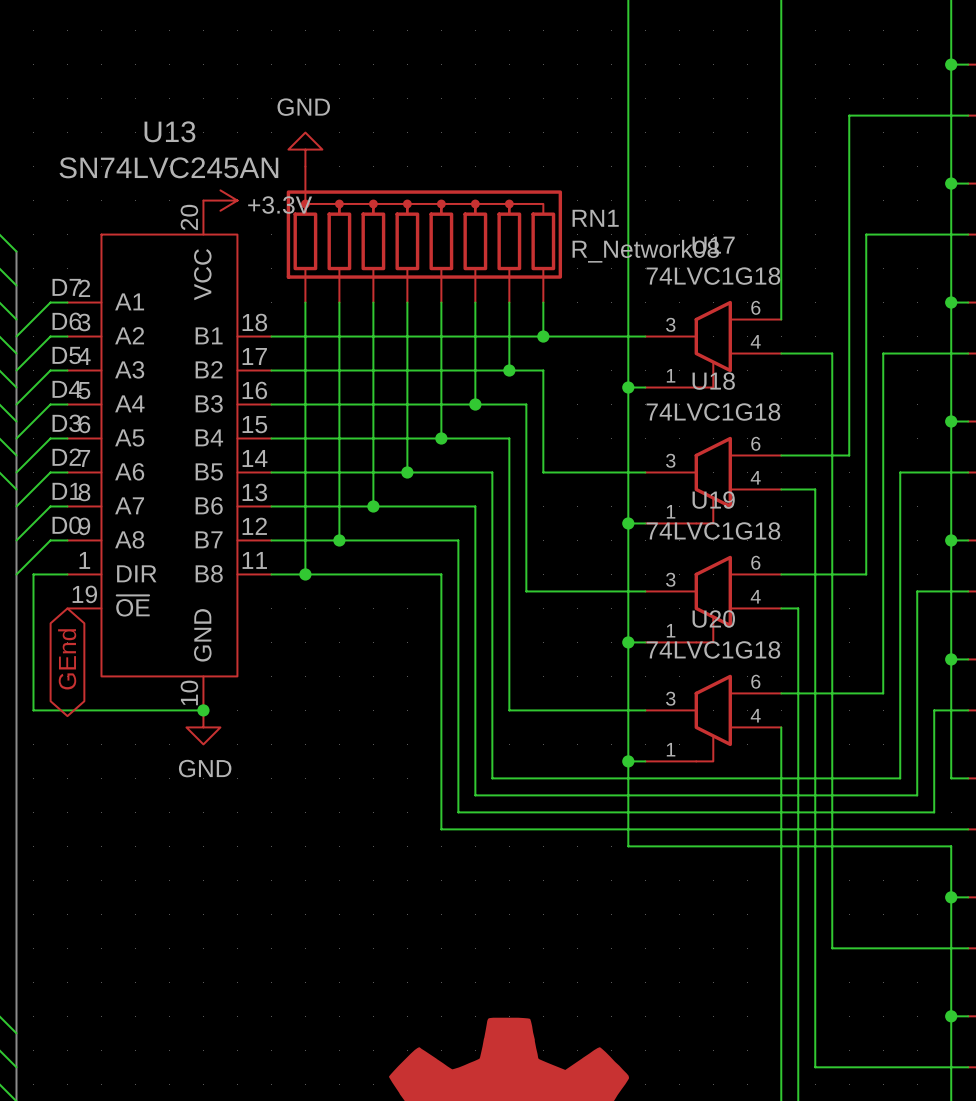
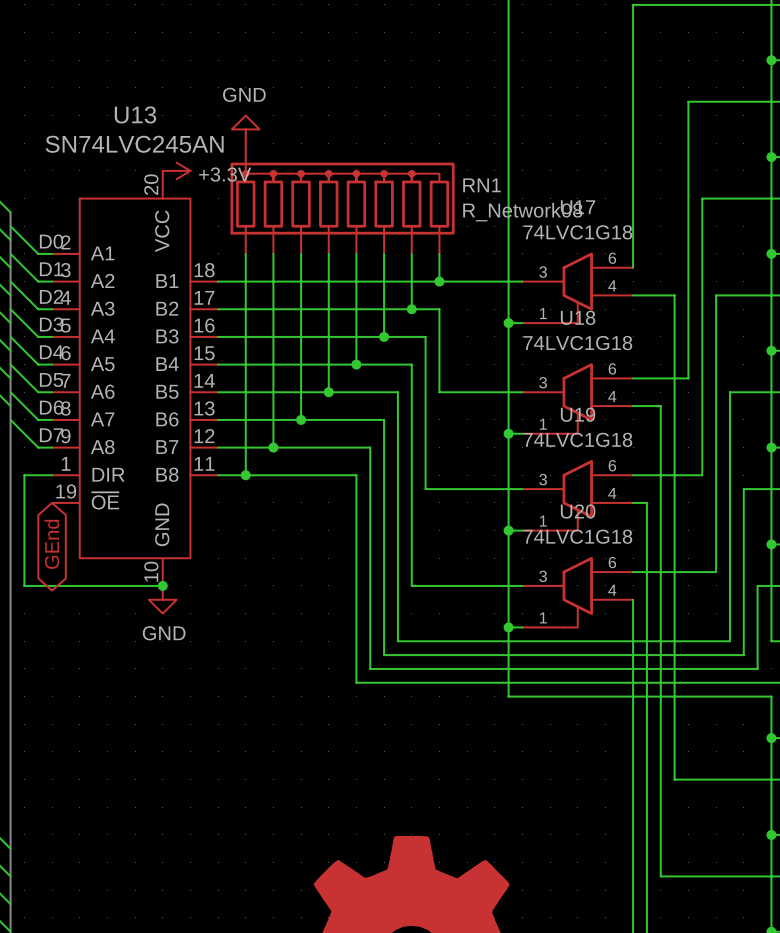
label: D7 (66, 287) -> D0 (51, 241)
wire: (50, 302) (16, 336) -> (38, 253) (10, 226)
label: D6 (66, 321) -> D1 (51, 269)
wire: (50, 336) (16, 370) -> (38, 281) (10, 253)
label: D5 (66, 355) -> D2 (51, 296)
wire: (50, 370) (16, 404) -> (38, 309) (10, 281)
label: D4 (66, 389) -> D3 (51, 324)
wire: (50, 404) (16, 438) -> (38, 336) (10, 309)
label: D3 (66, 423) -> D4 (51, 352)
wire: (50, 438) (16, 472) -> (38, 364) (10, 336)
label: D2 (66, 457) -> D5 (51, 380)
wire: (50, 472) (16, 506) -> (38, 392) (10, 364)
label: D1 (66, 491) -> D6 (51, 407)
wire: (50, 506) (16, 540) -> (38, 419) (10, 392)
label: D0 (66, 525) -> D7 (51, 435)
wire: (50, 540) (16, 574) -> (38, 447) (10, 419)

